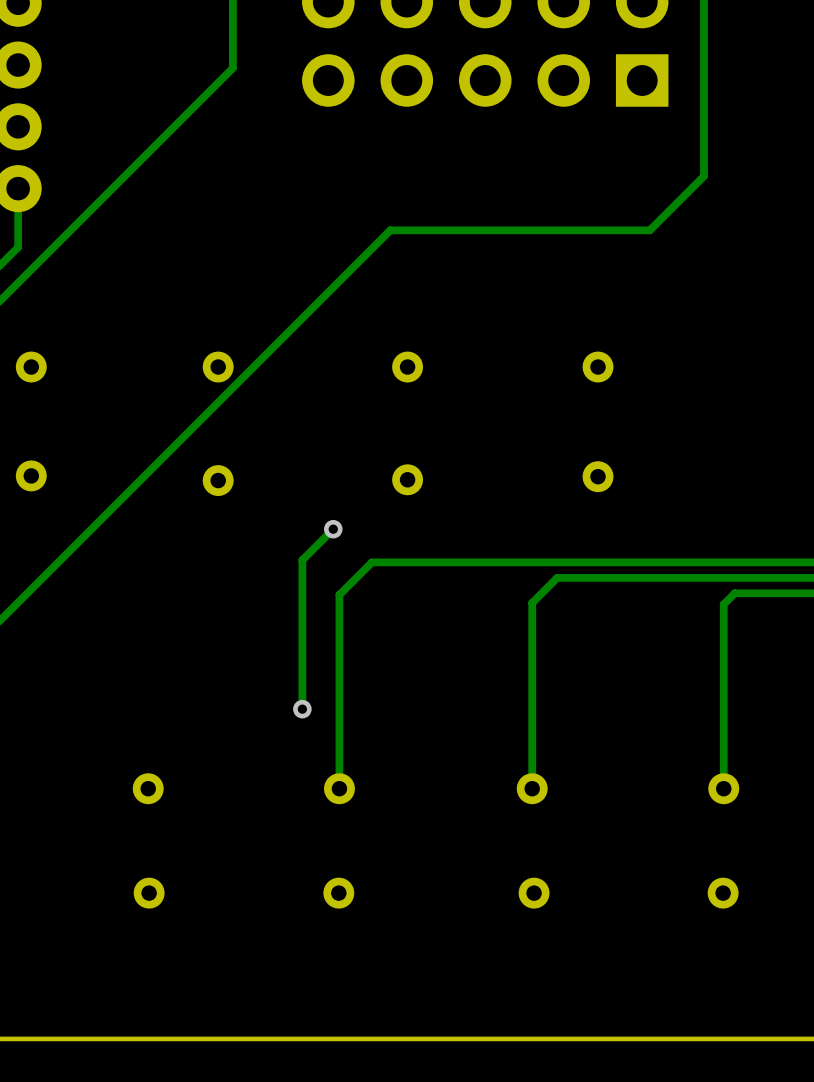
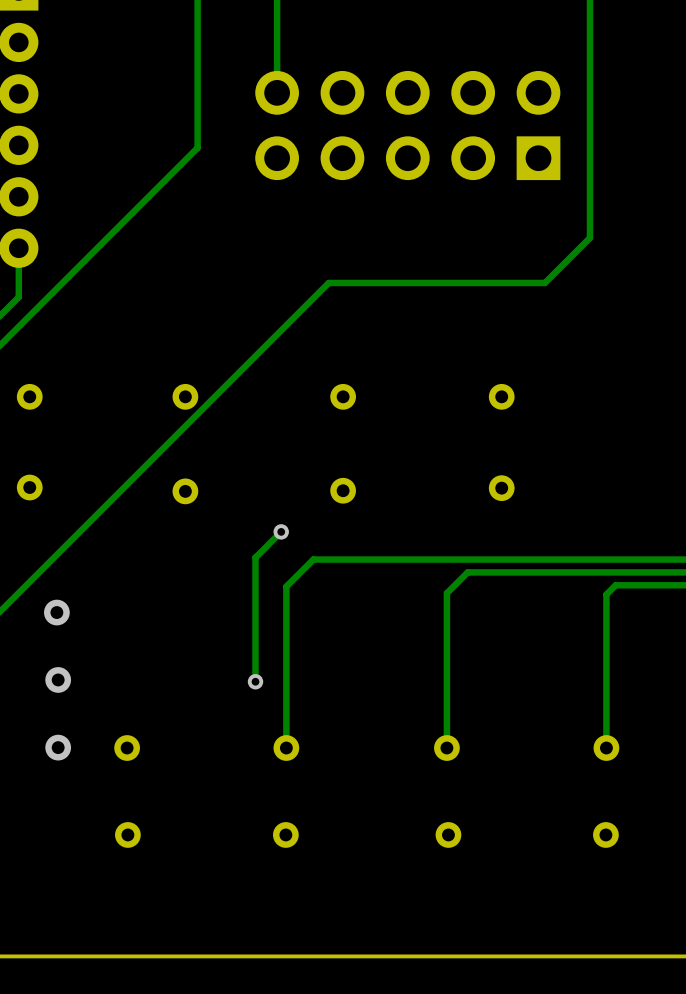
via: none -> (56, 612)
via: none -> (58, 679)
via: none -> (58, 747)

